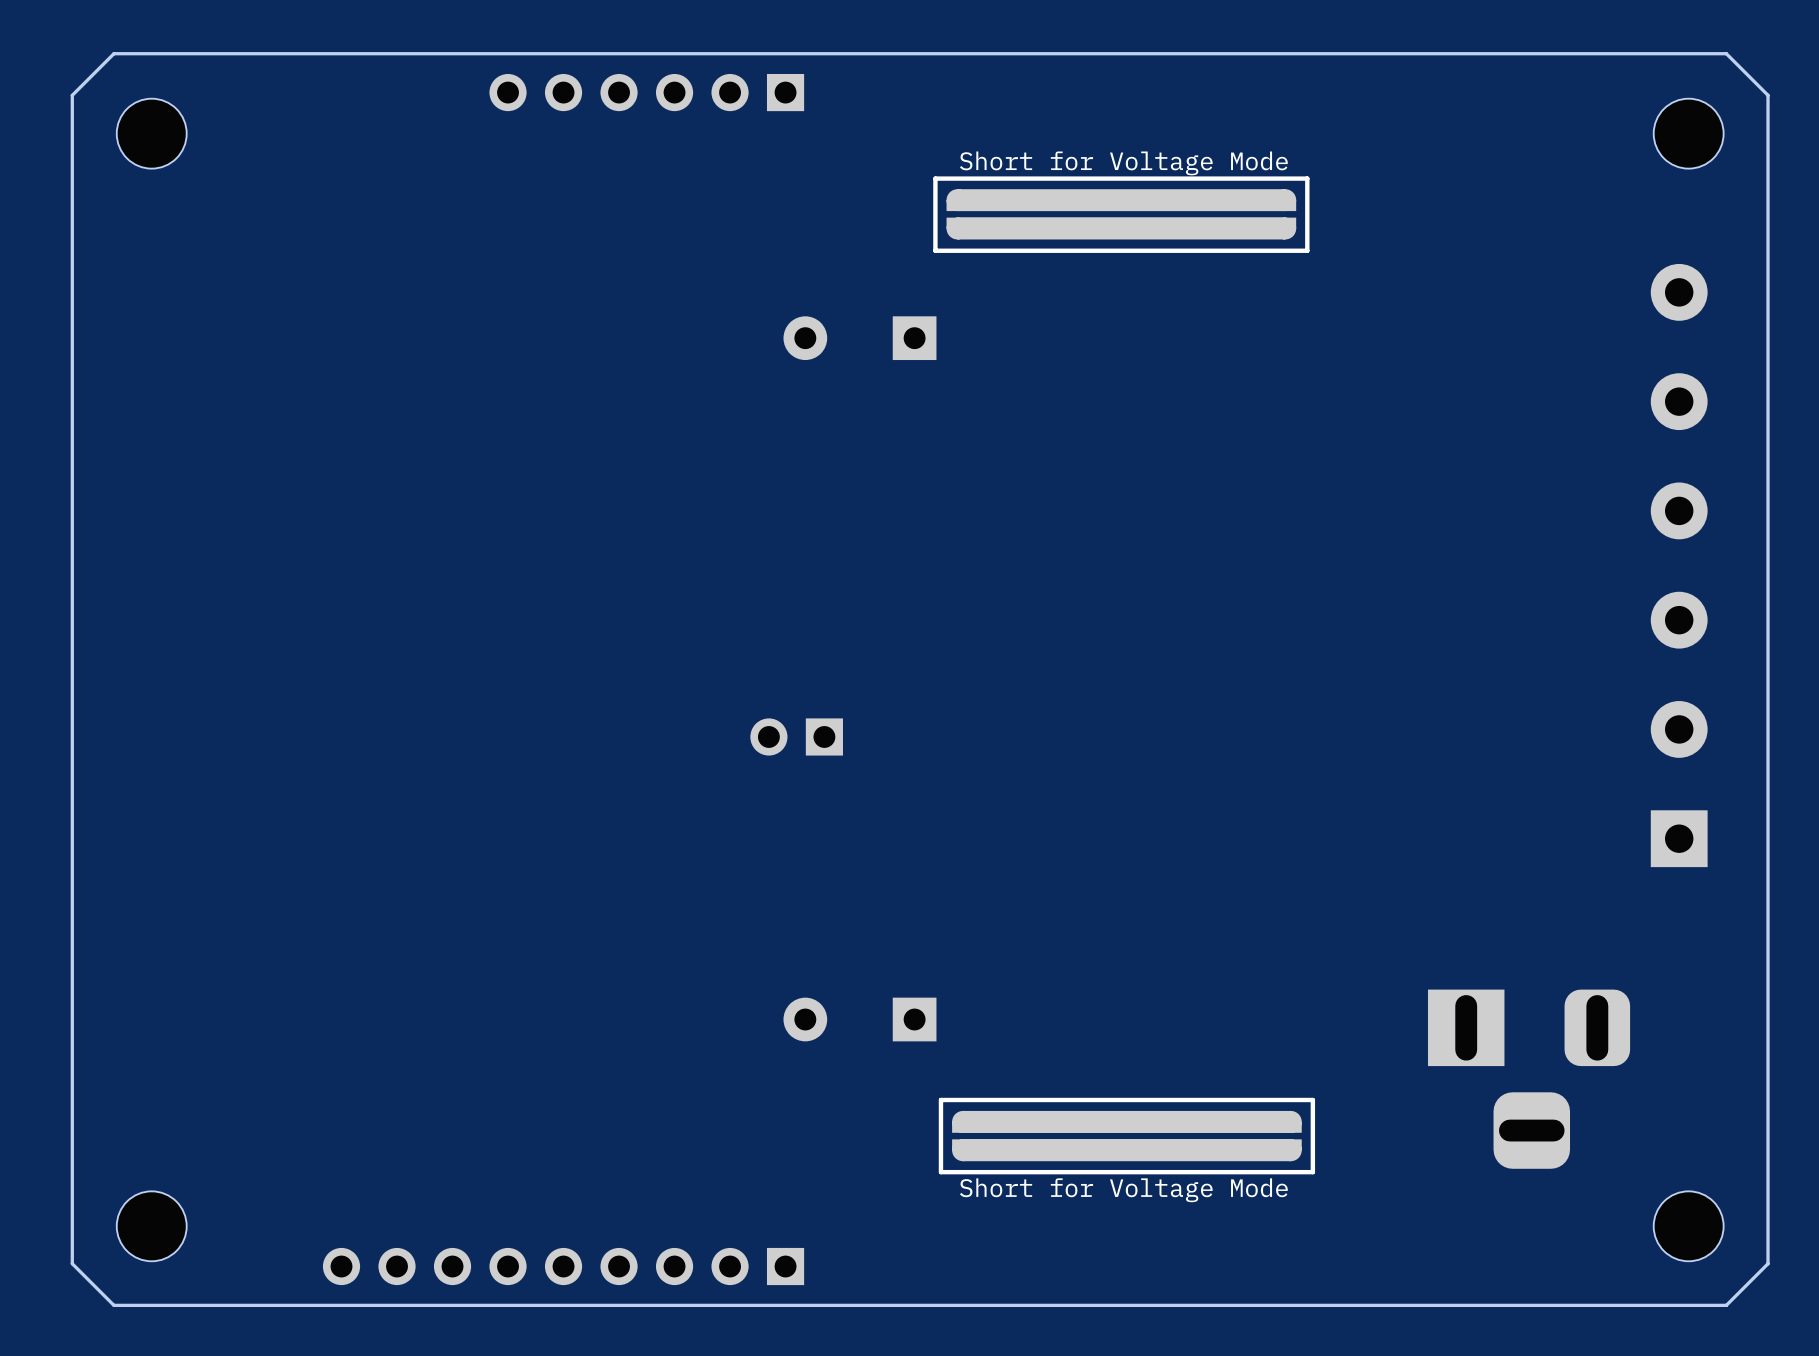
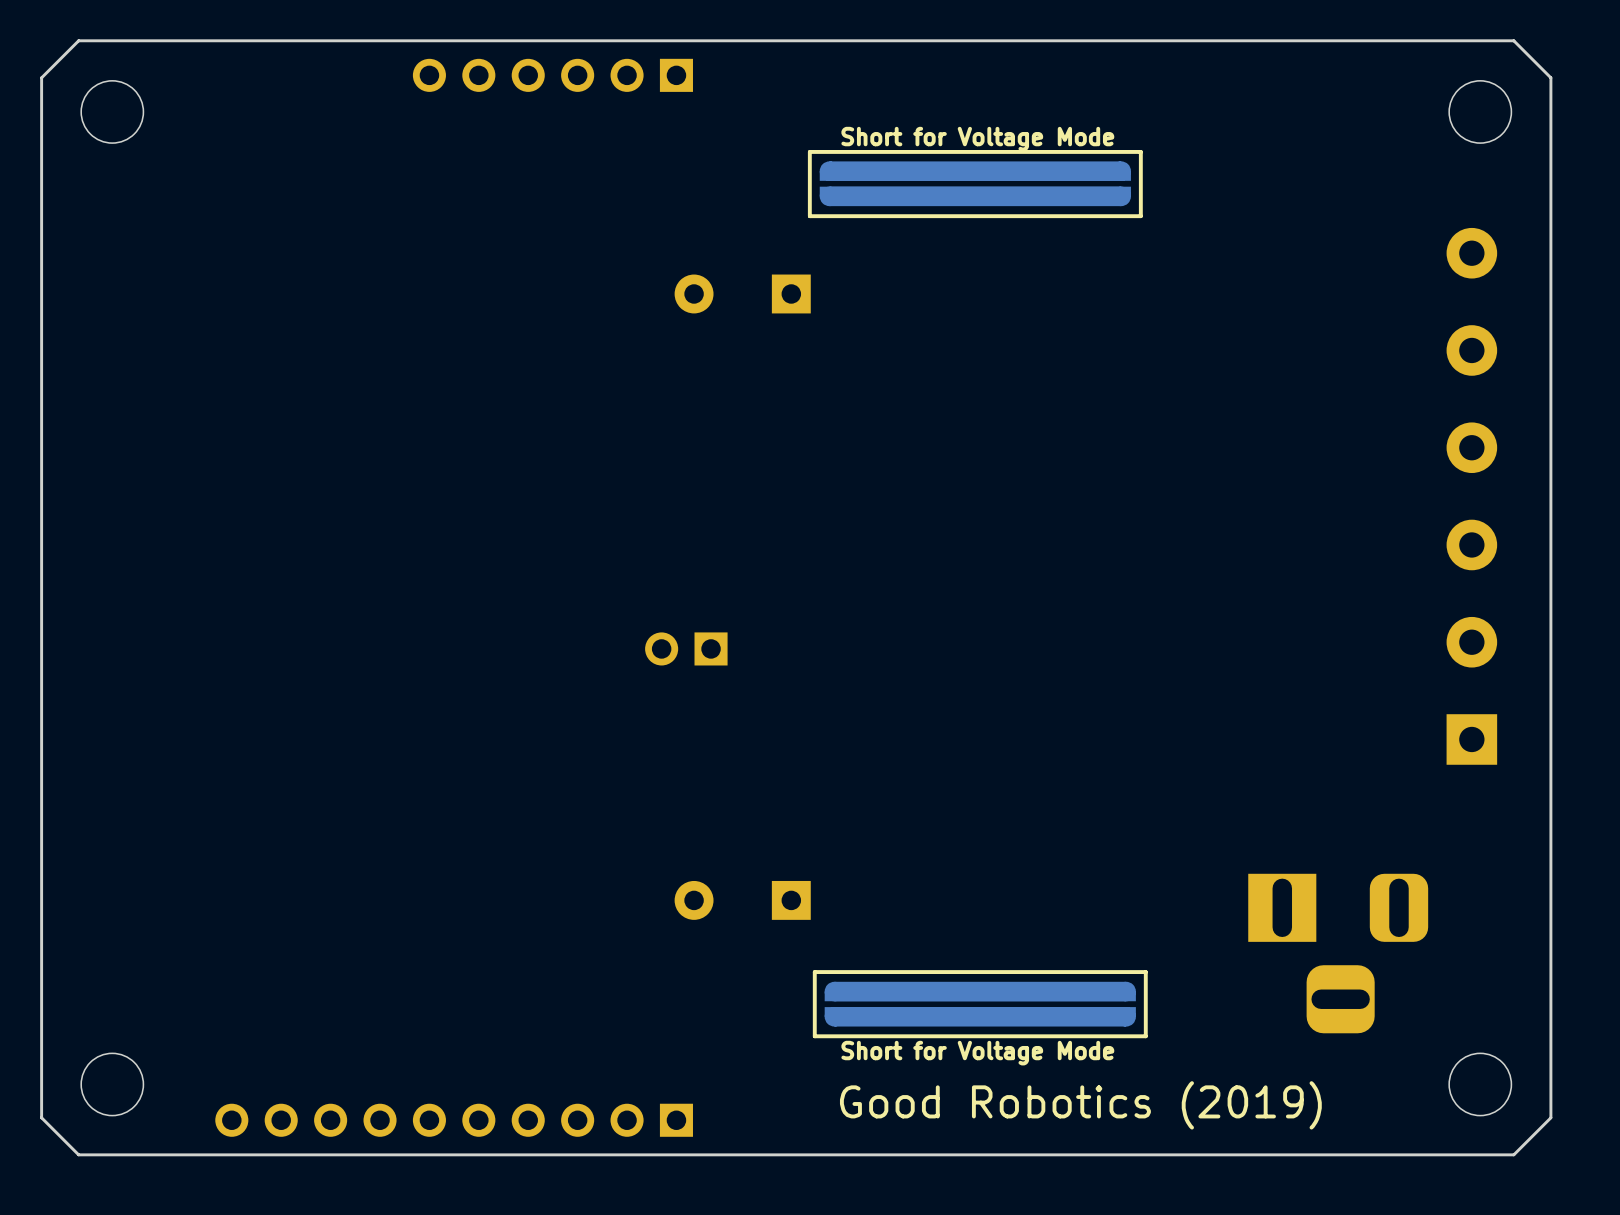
text: none -> Good Robotics (2019) (1080, 1105)
part: none -> (454, 1120)

